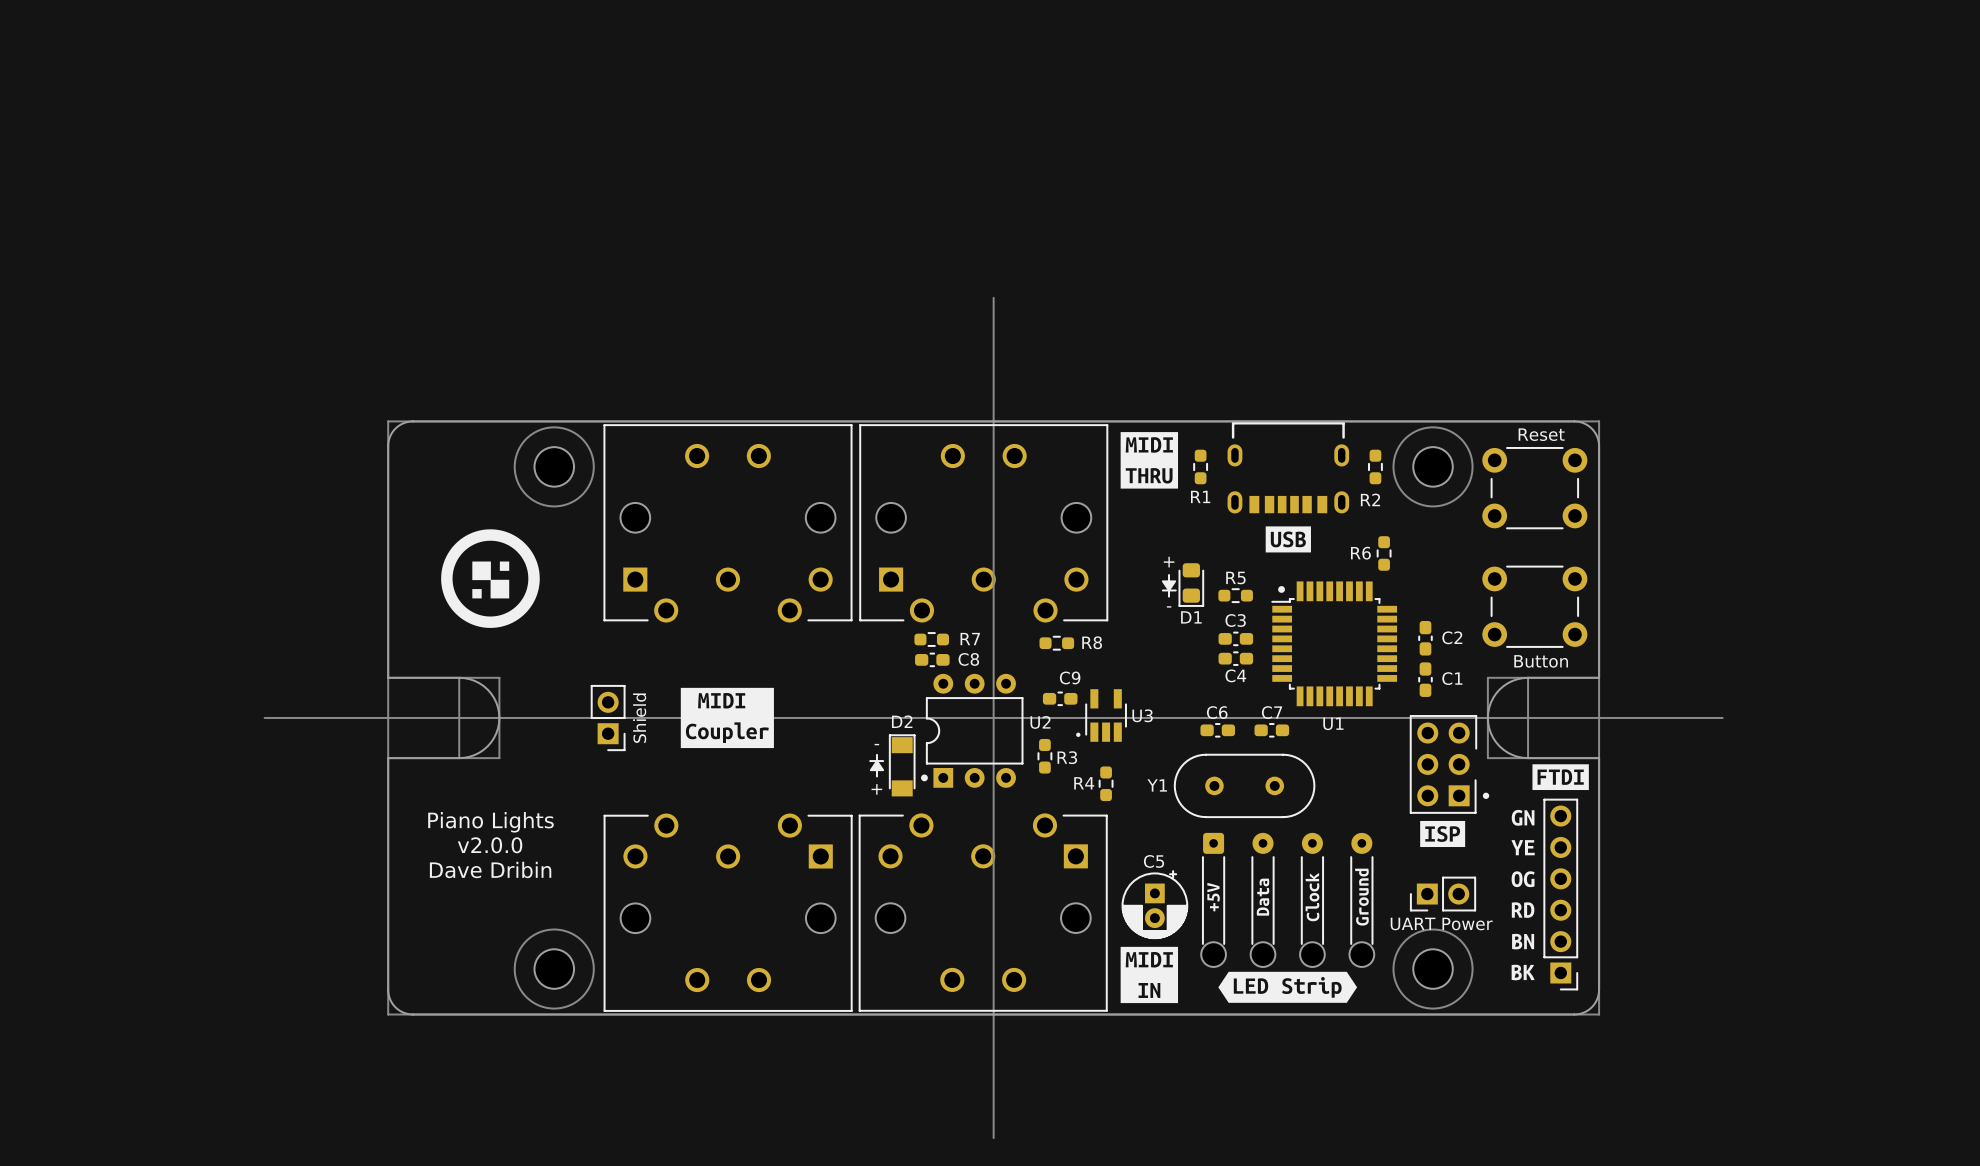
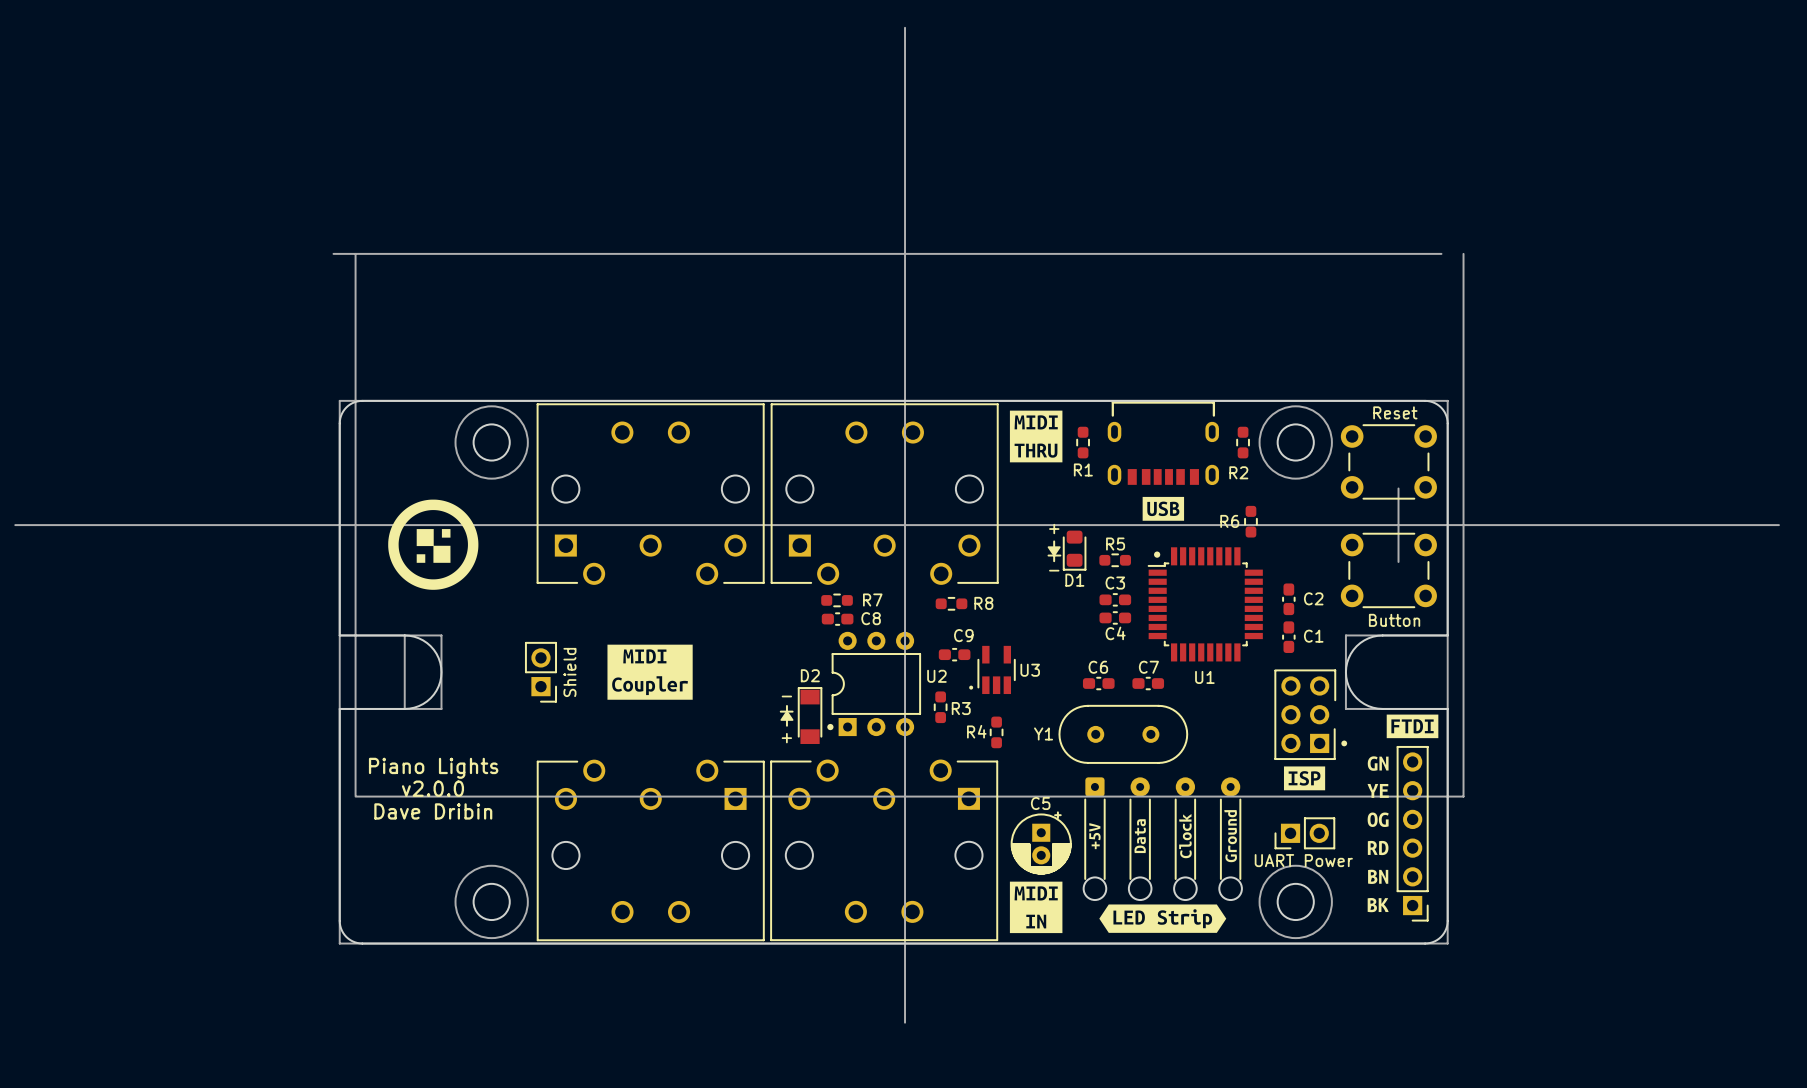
line: none -> (905, 27) (905, 1022)
line: none -> (333, 253) (1441, 253)
line: none -> (355, 253) (355, 795)
line: none -> (1463, 253) (1463, 796) (355, 796)
line: (993, 297) (993, 1138) -> none
line: none -> (15, 525) (1778, 525)
line: (1528, 677) (1528, 758) -> (1398, 488) (1398, 561)
line: (264, 717) (1722, 717) -> none

